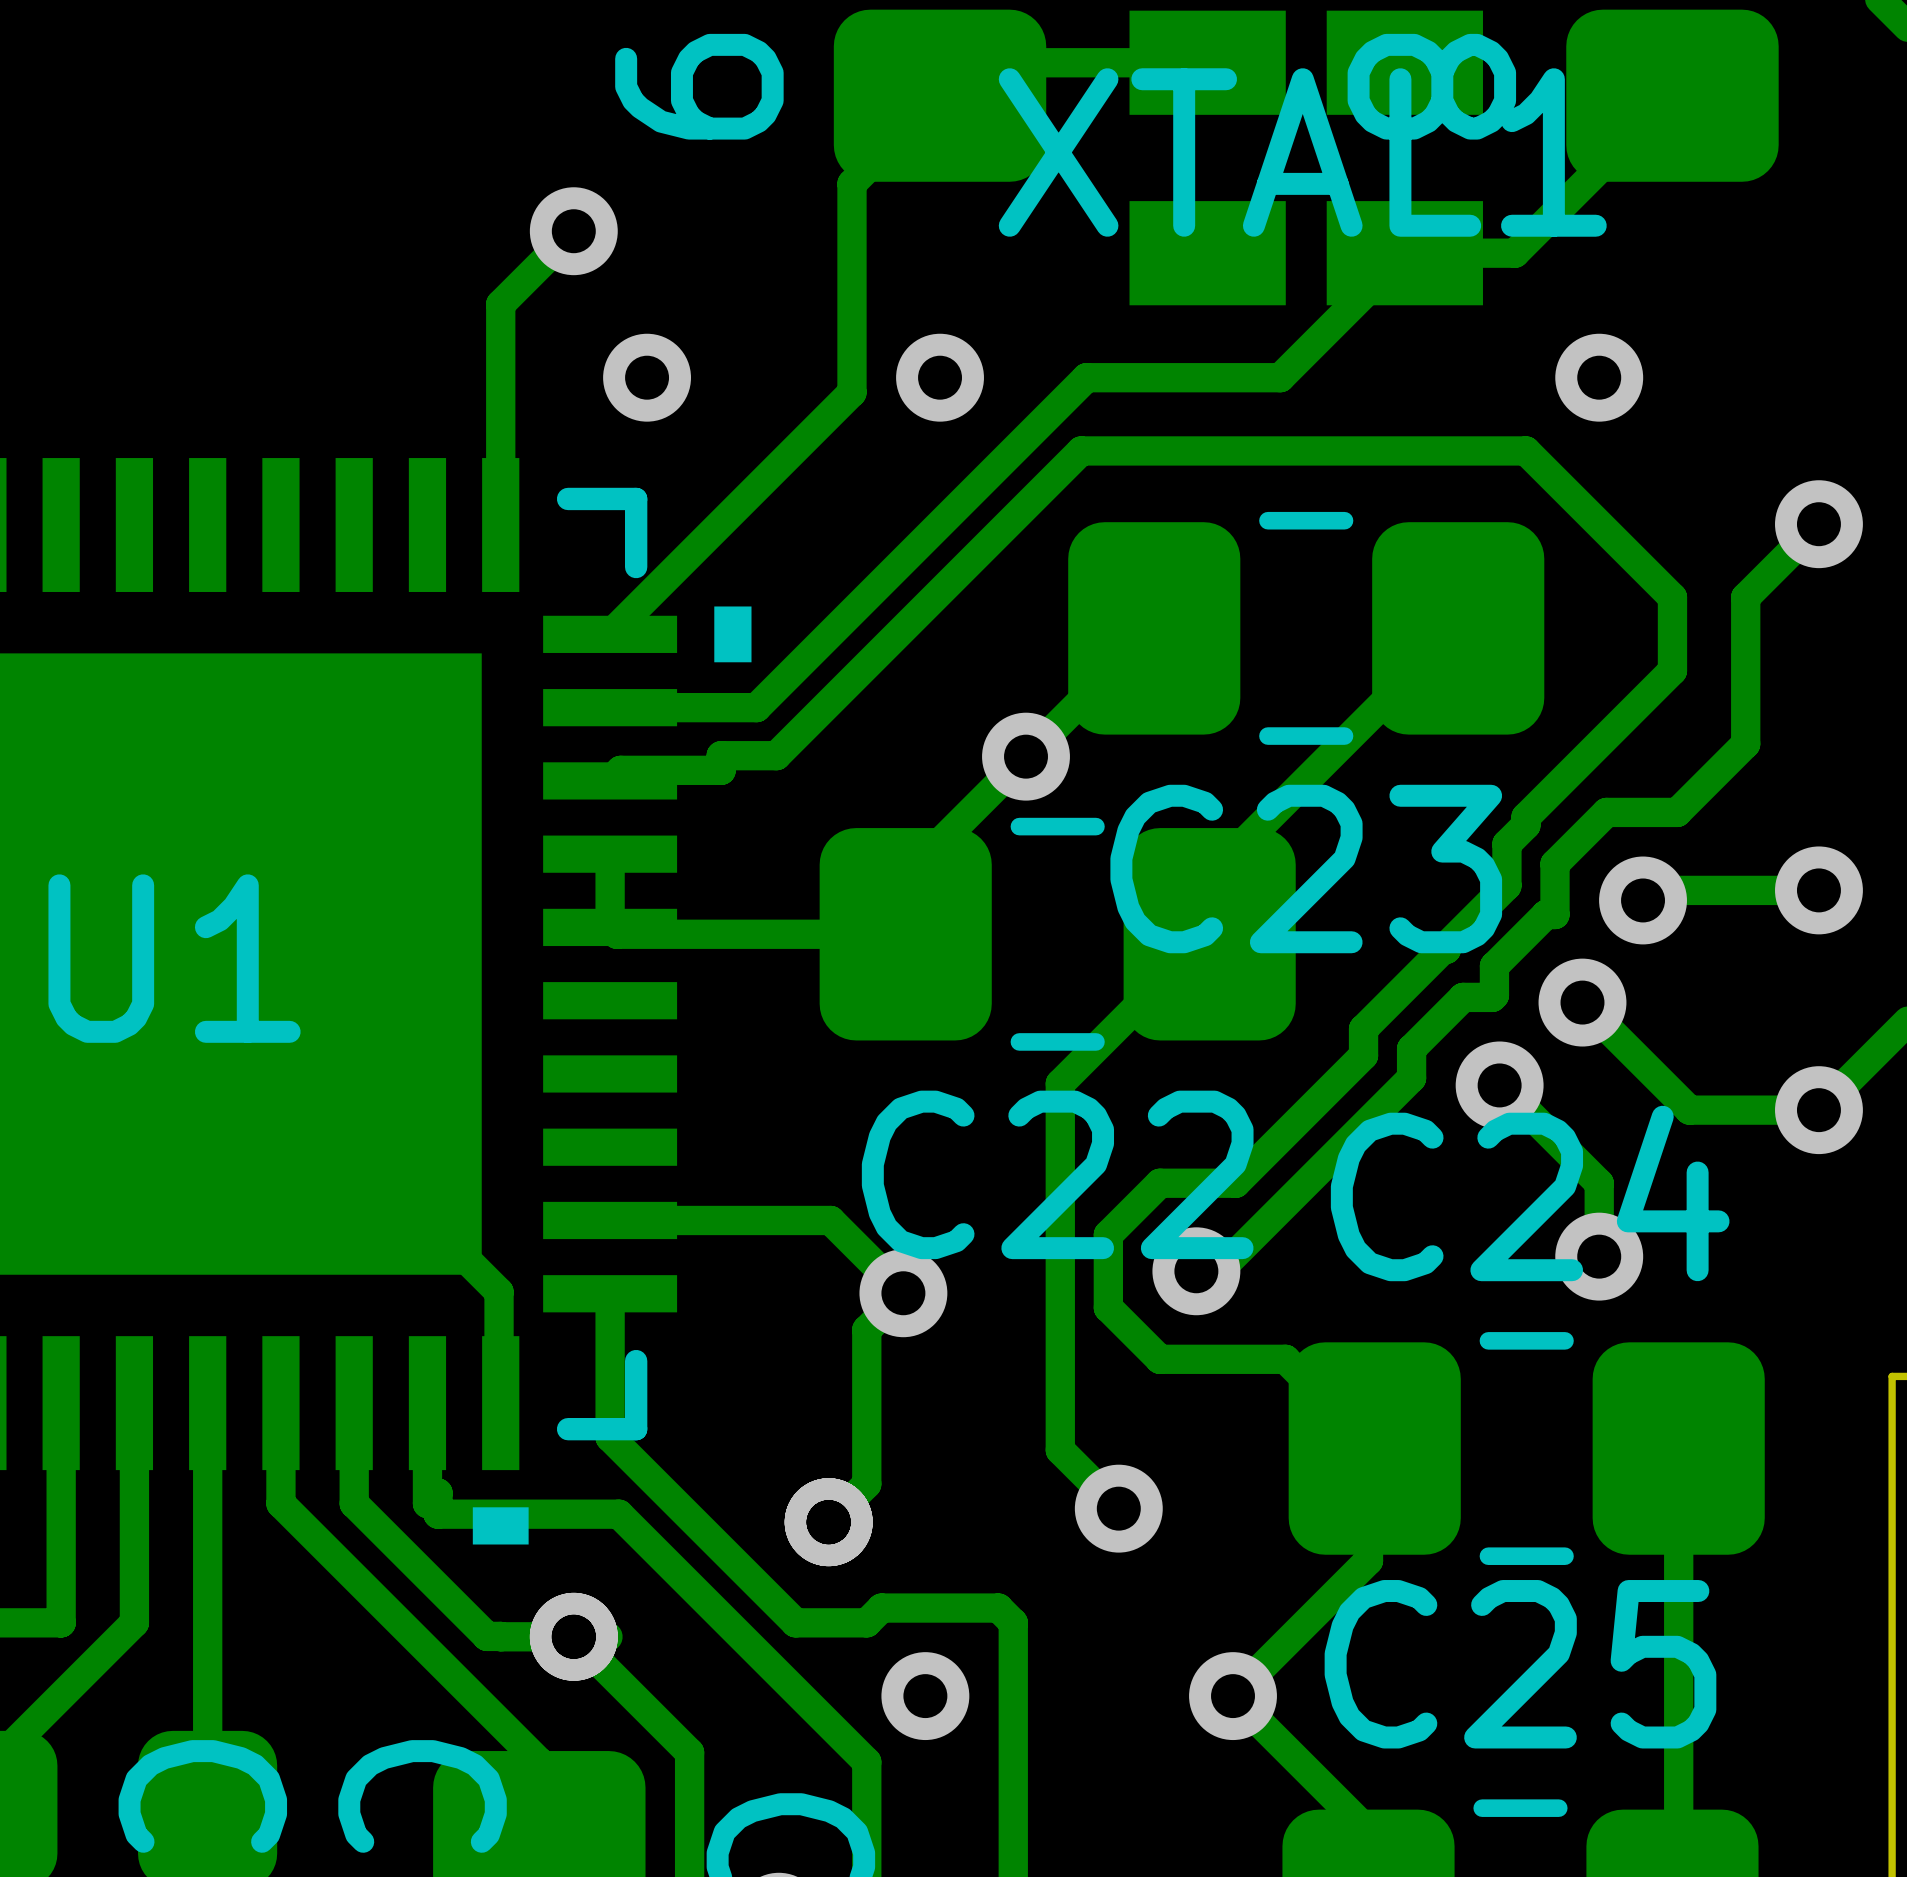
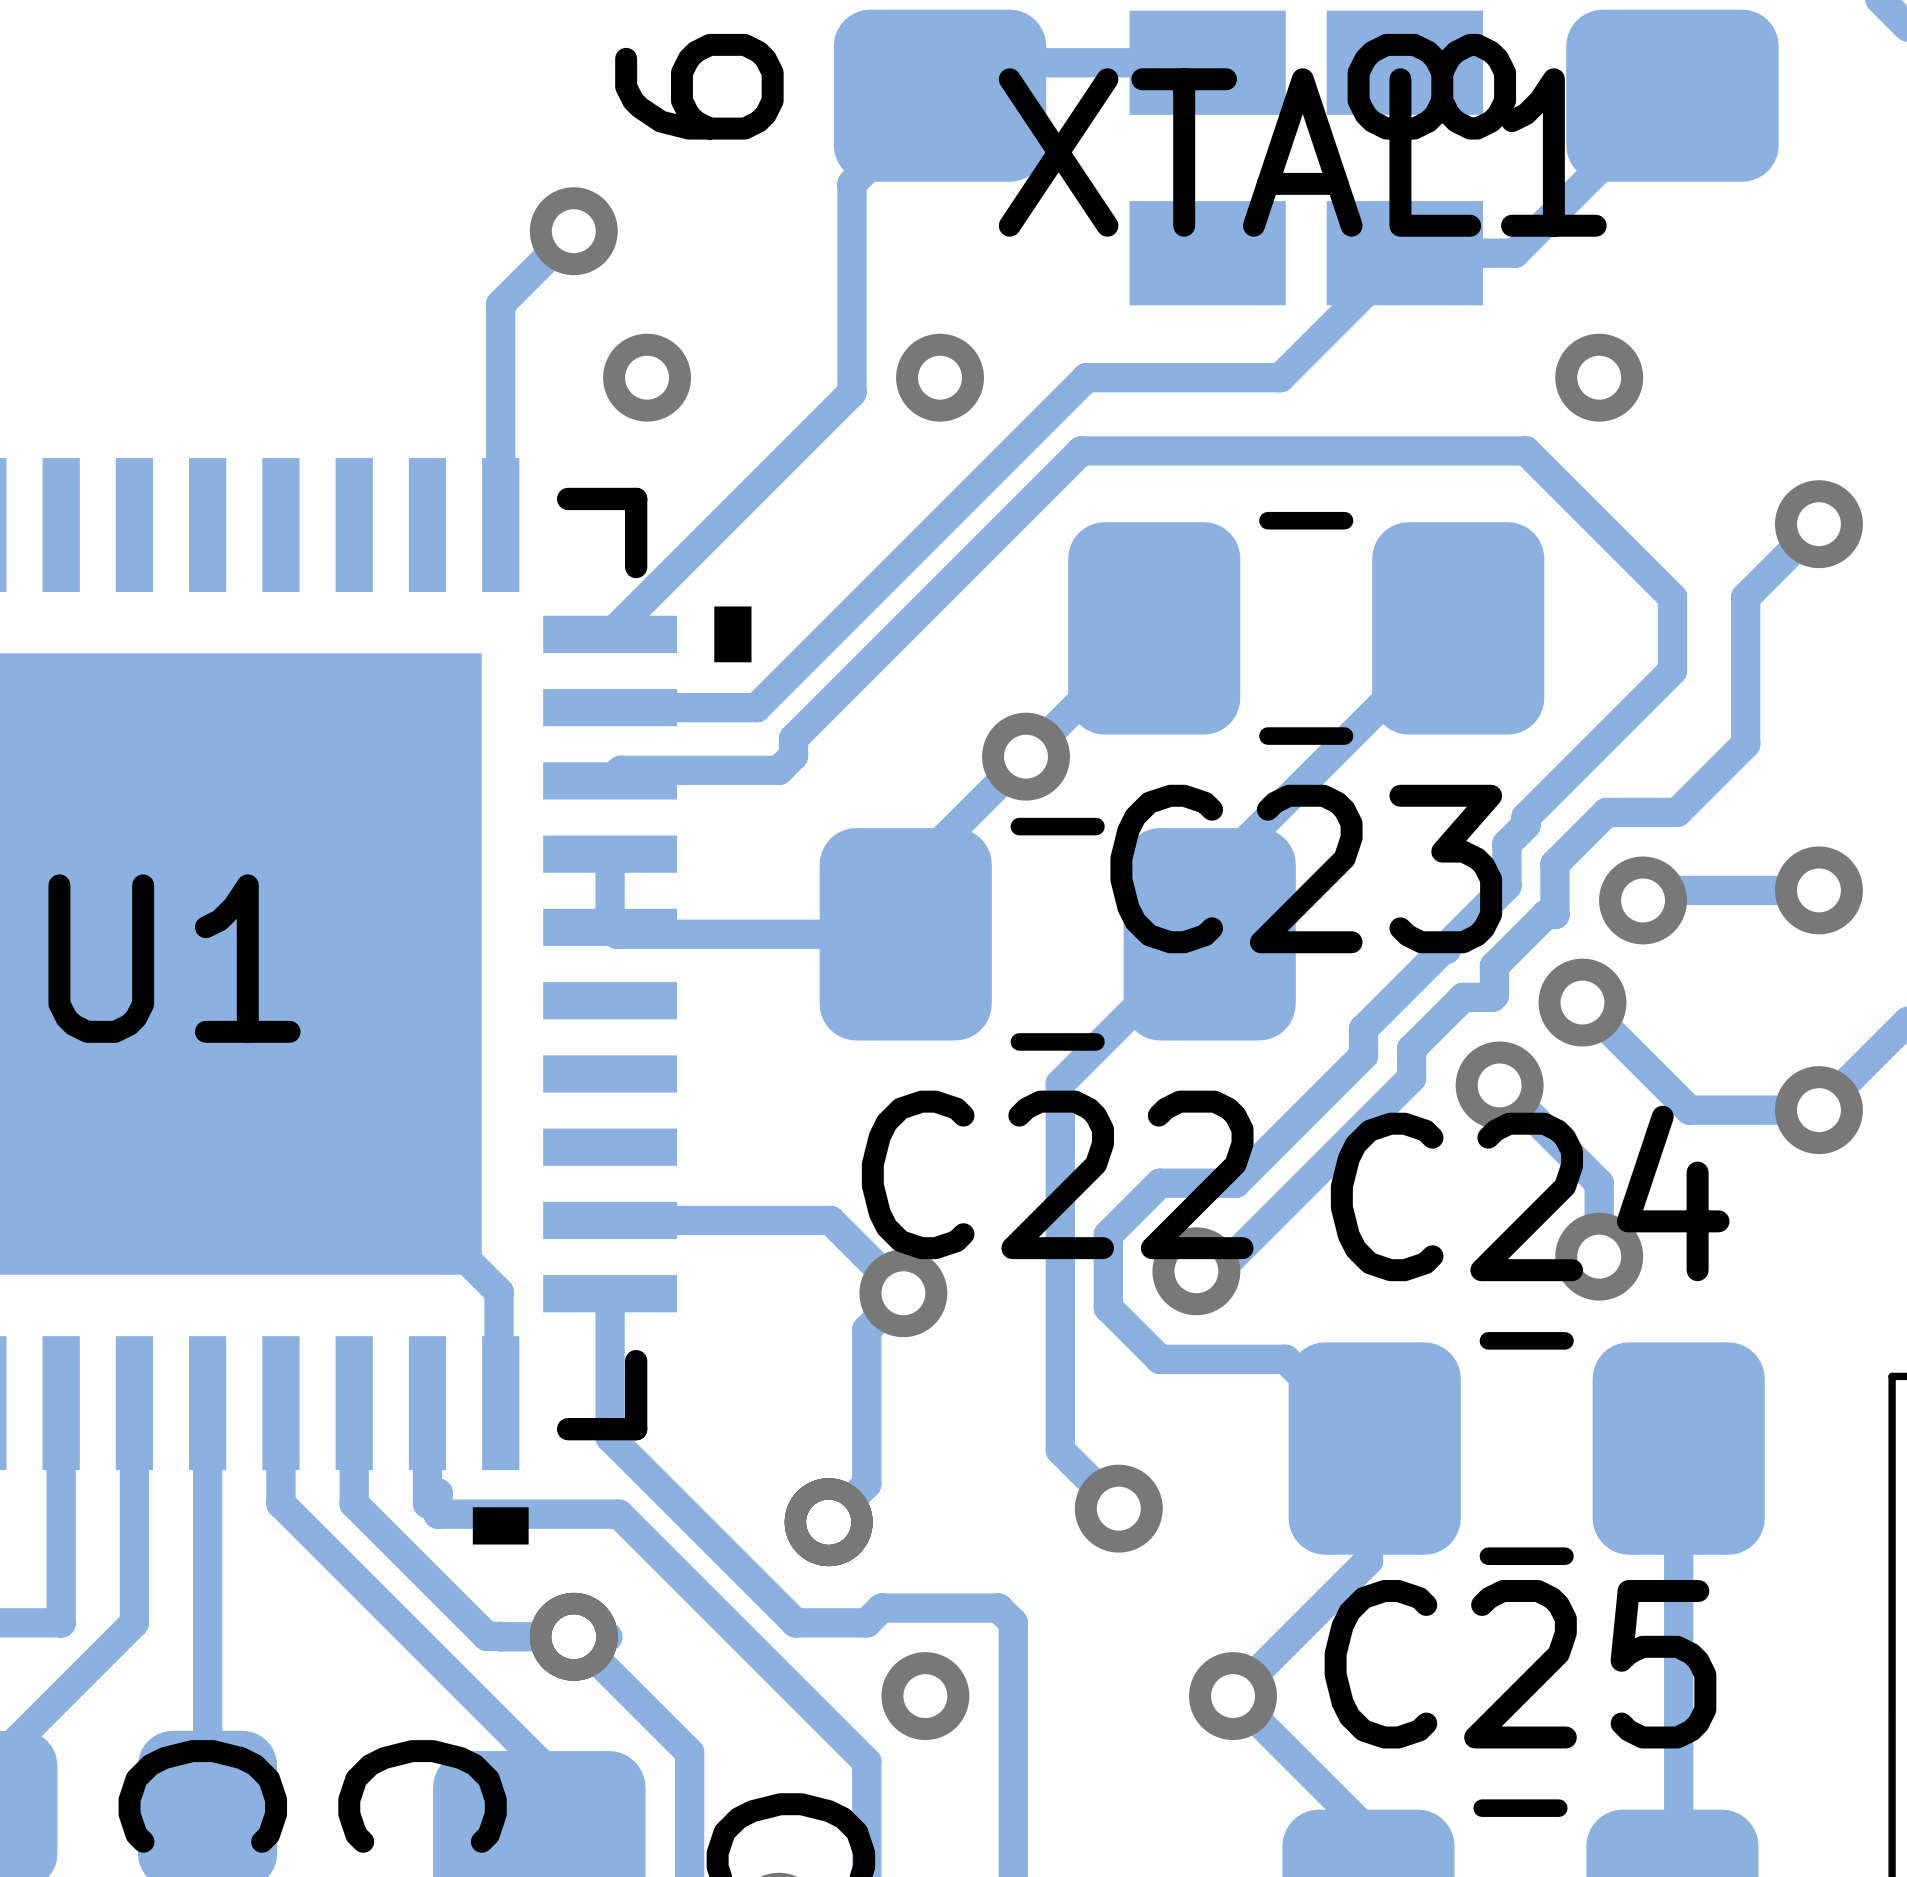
track: (793, 738) (776, 755) (721, 755) (721, 770) -> (793, 738) (793, 755) (778, 770) (721, 770)

